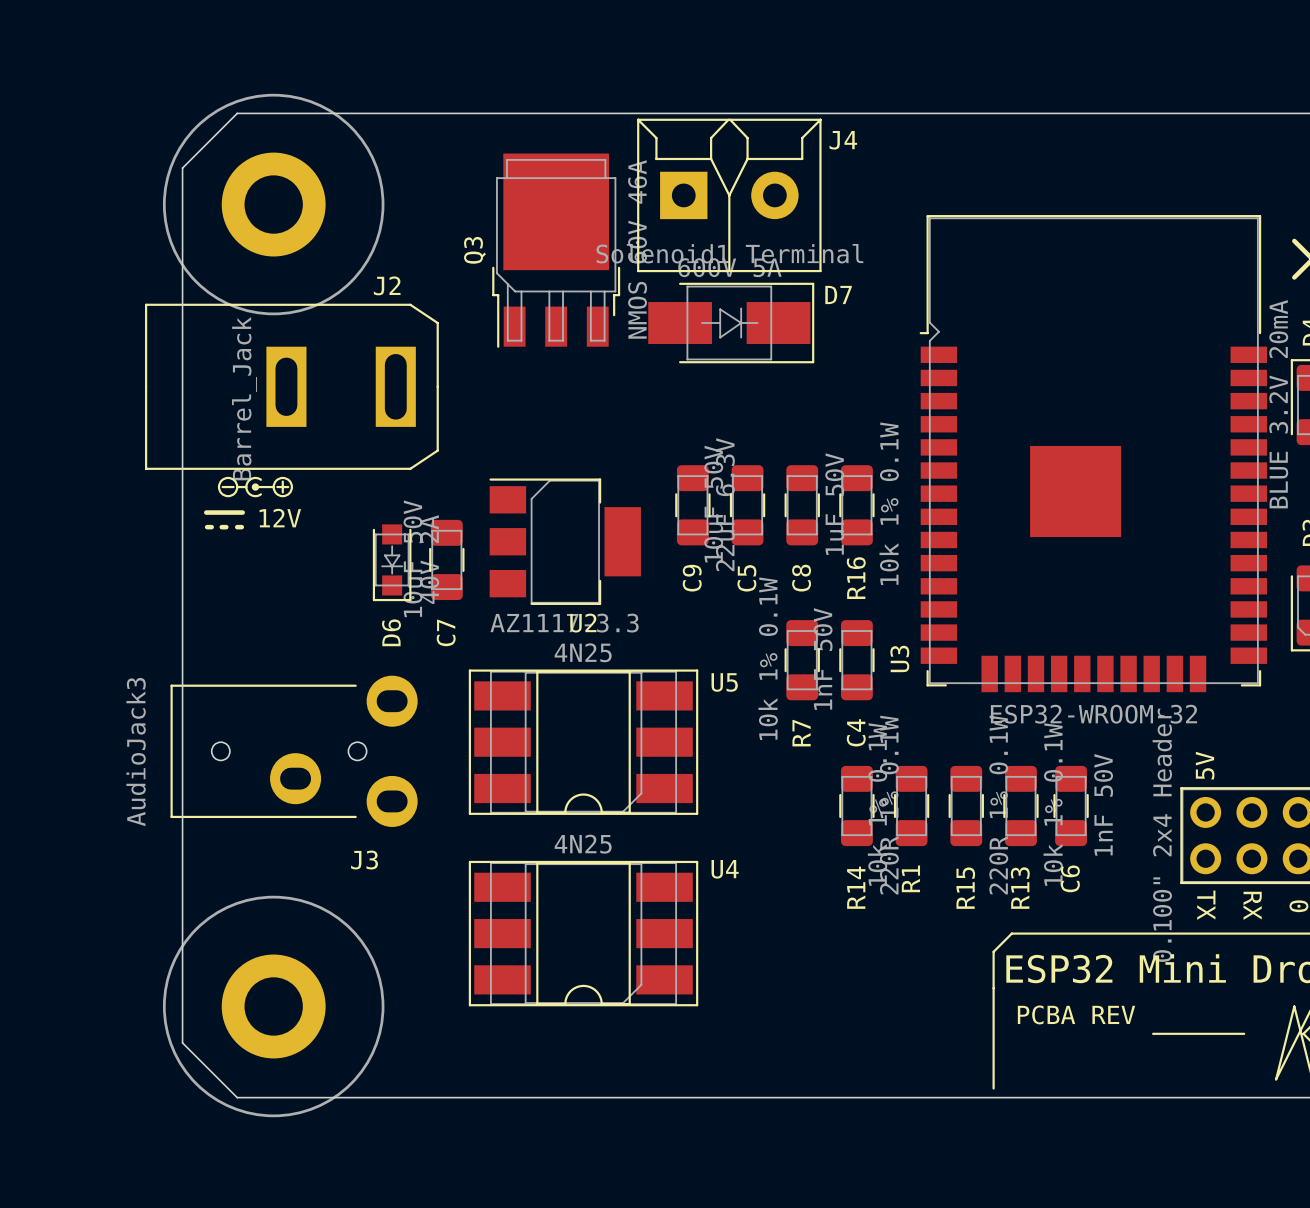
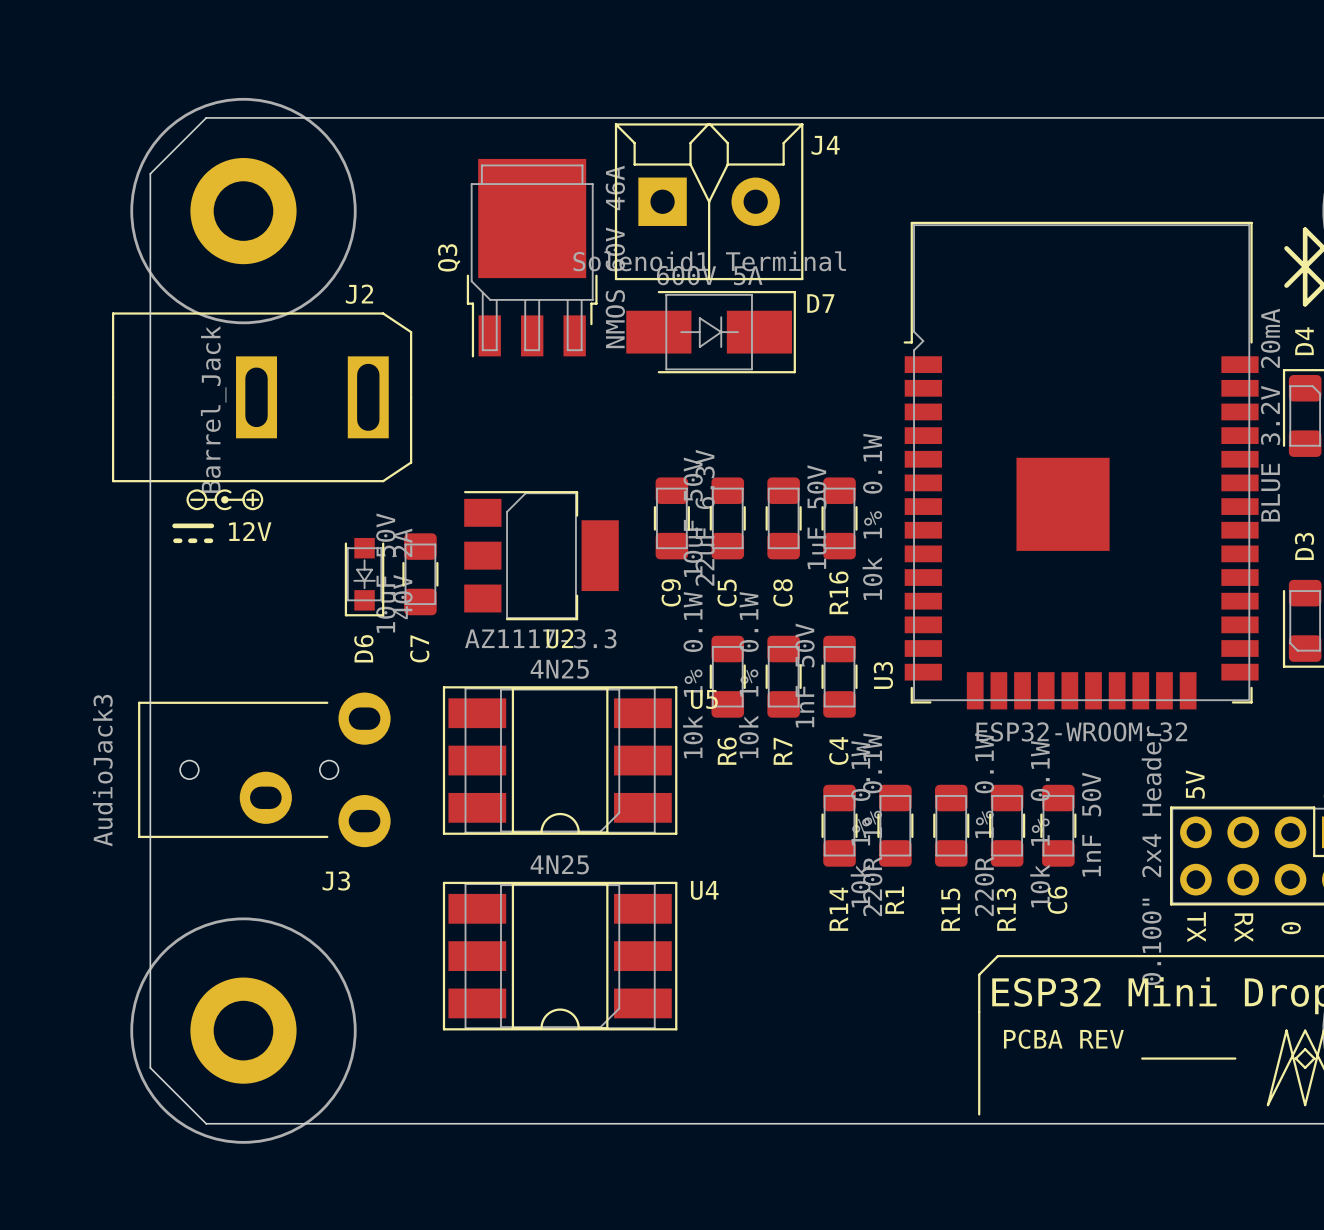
R6: none -> 10k 1% 0.1W (727, 676)

